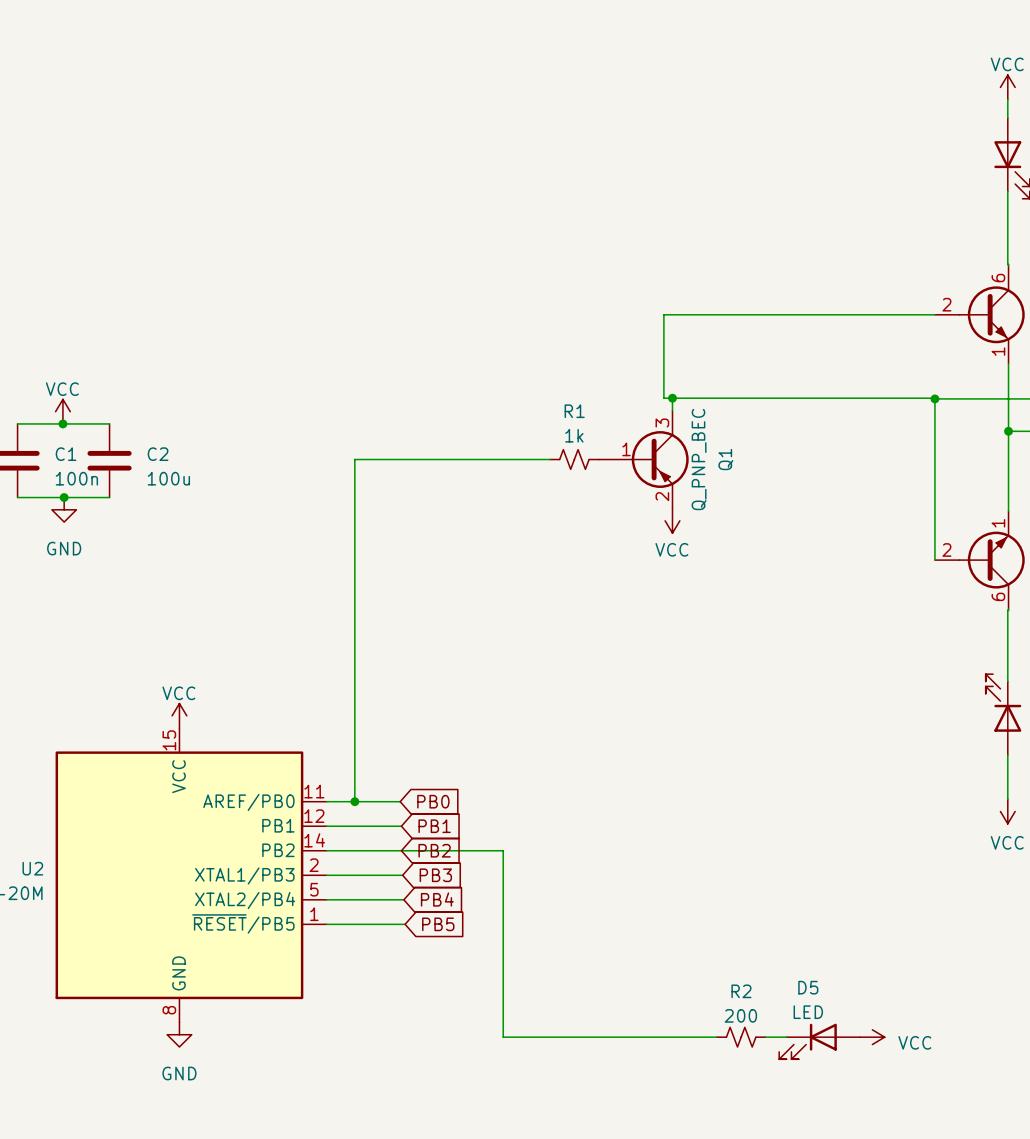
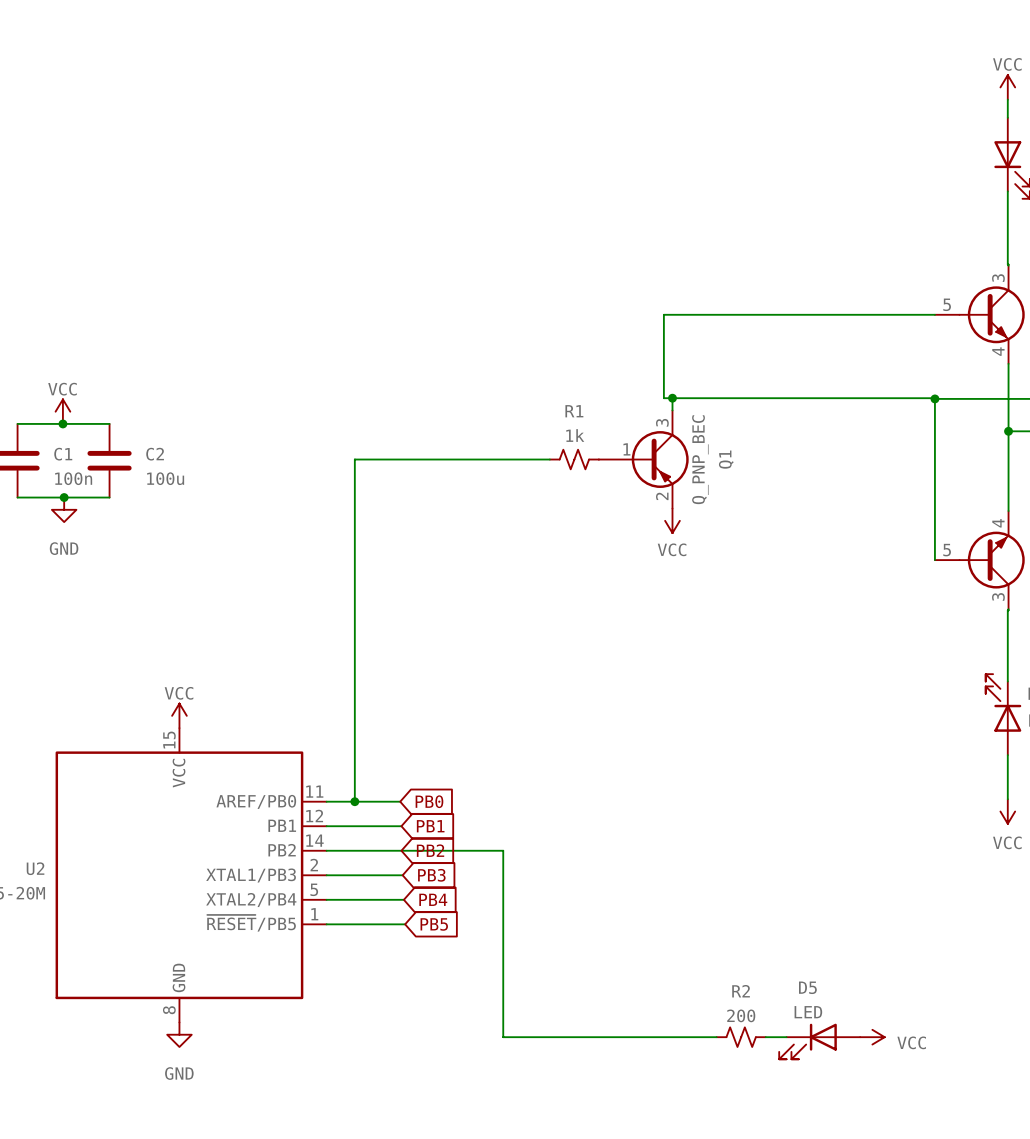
part pin number: 6 (998, 278) -> 3 (998, 278)
part pin number: 2 (946, 304) -> 5 (947, 304)
part pin number: 1 (998, 351) -> 4 (998, 351)
part pin number: 1 (998, 523) -> 4 (998, 523)
part pin number: 2 (946, 549) -> 5 (947, 550)
part pin number: 6 (998, 596) -> 3 (998, 596)

